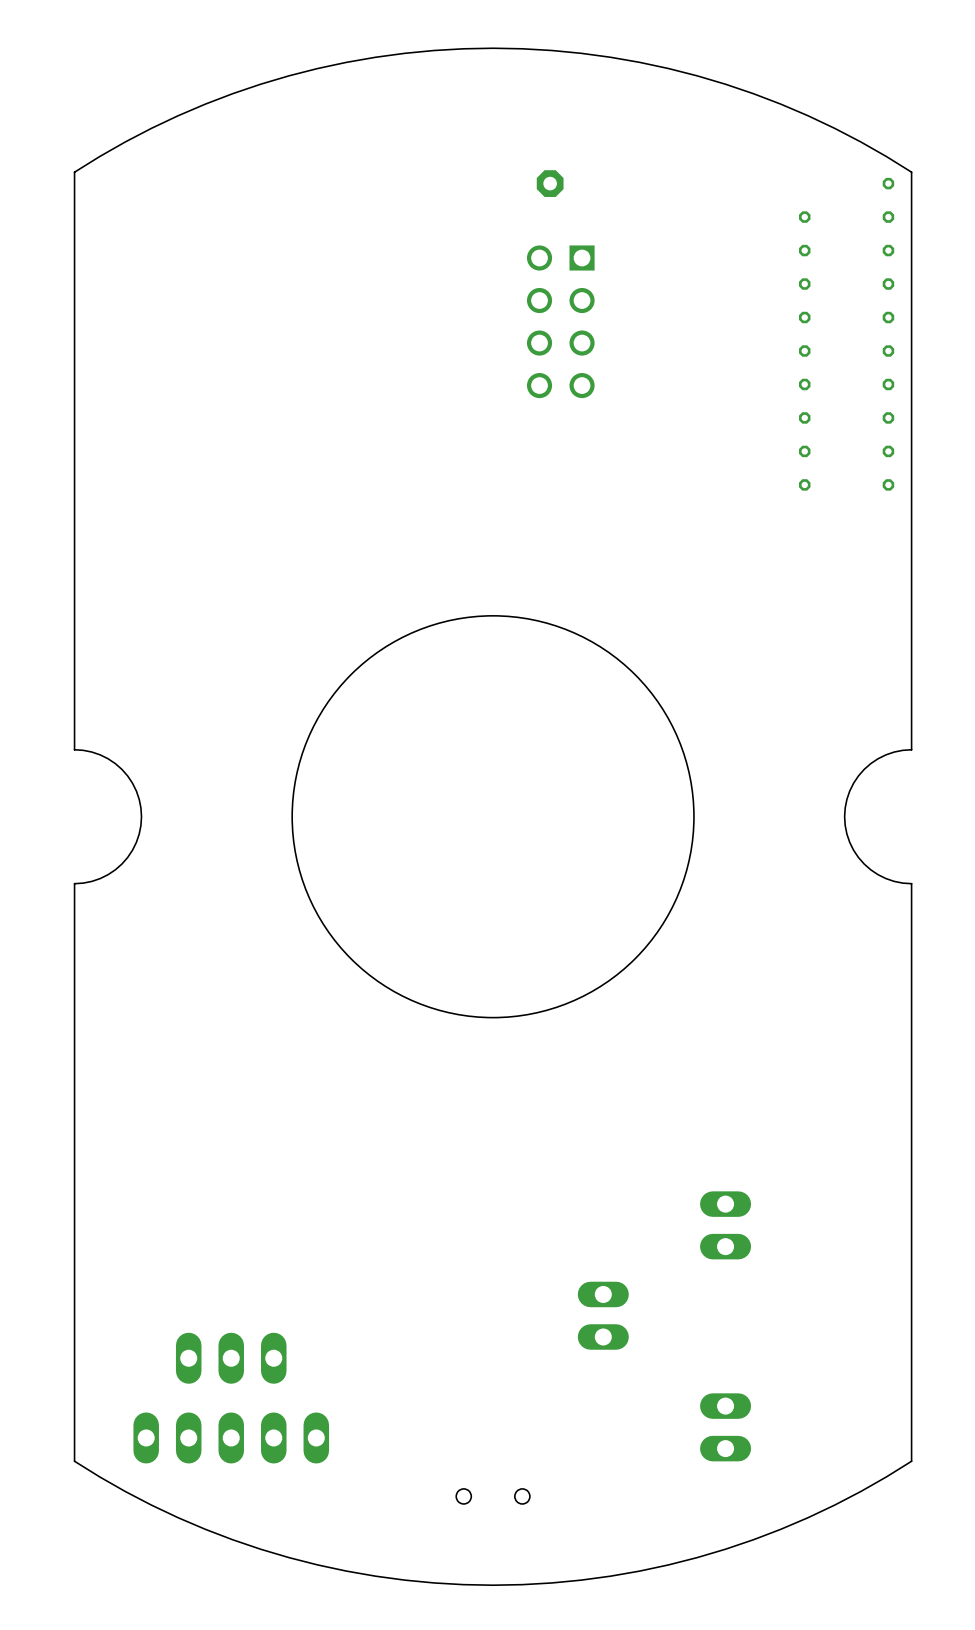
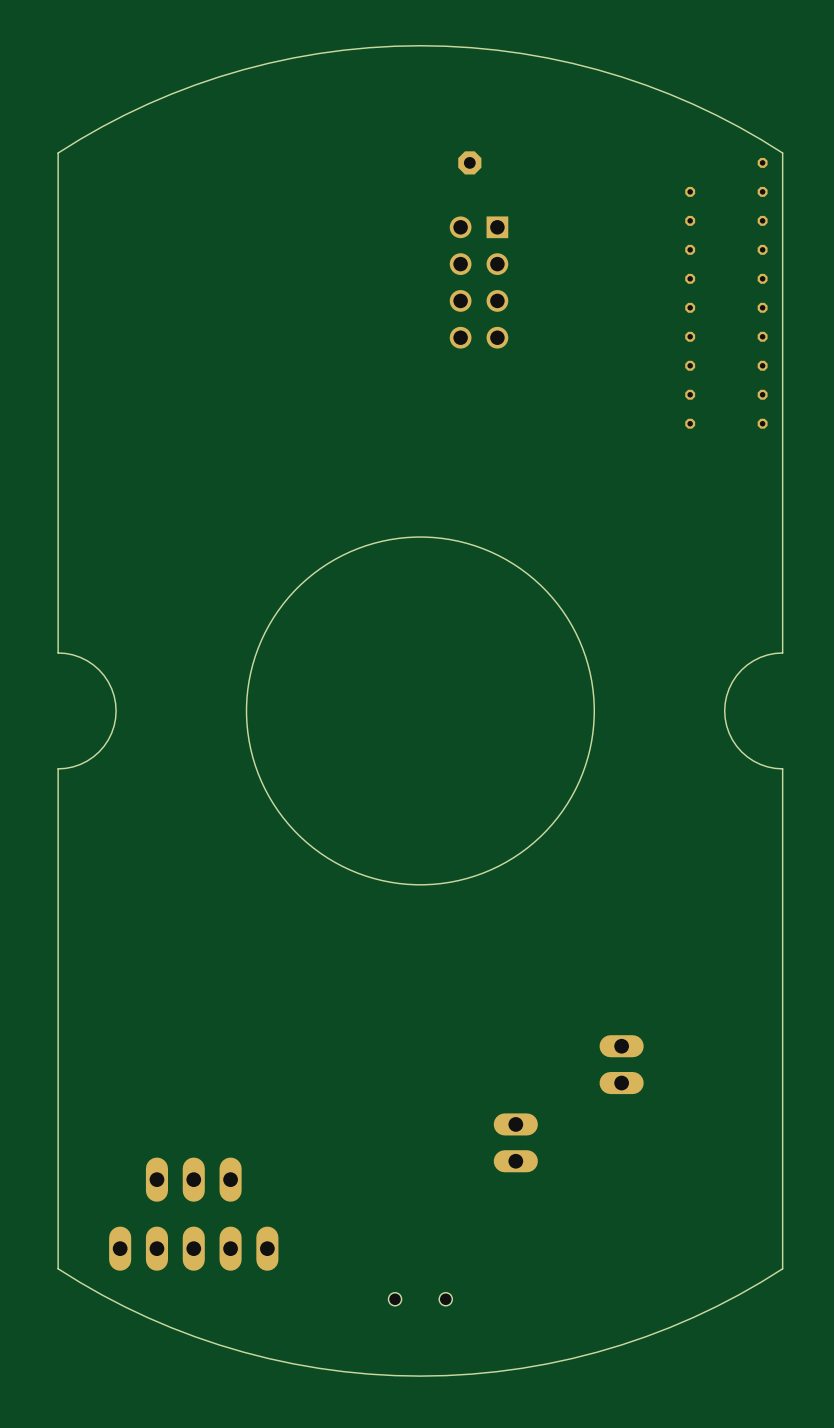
part: (725, 1427) -> none

